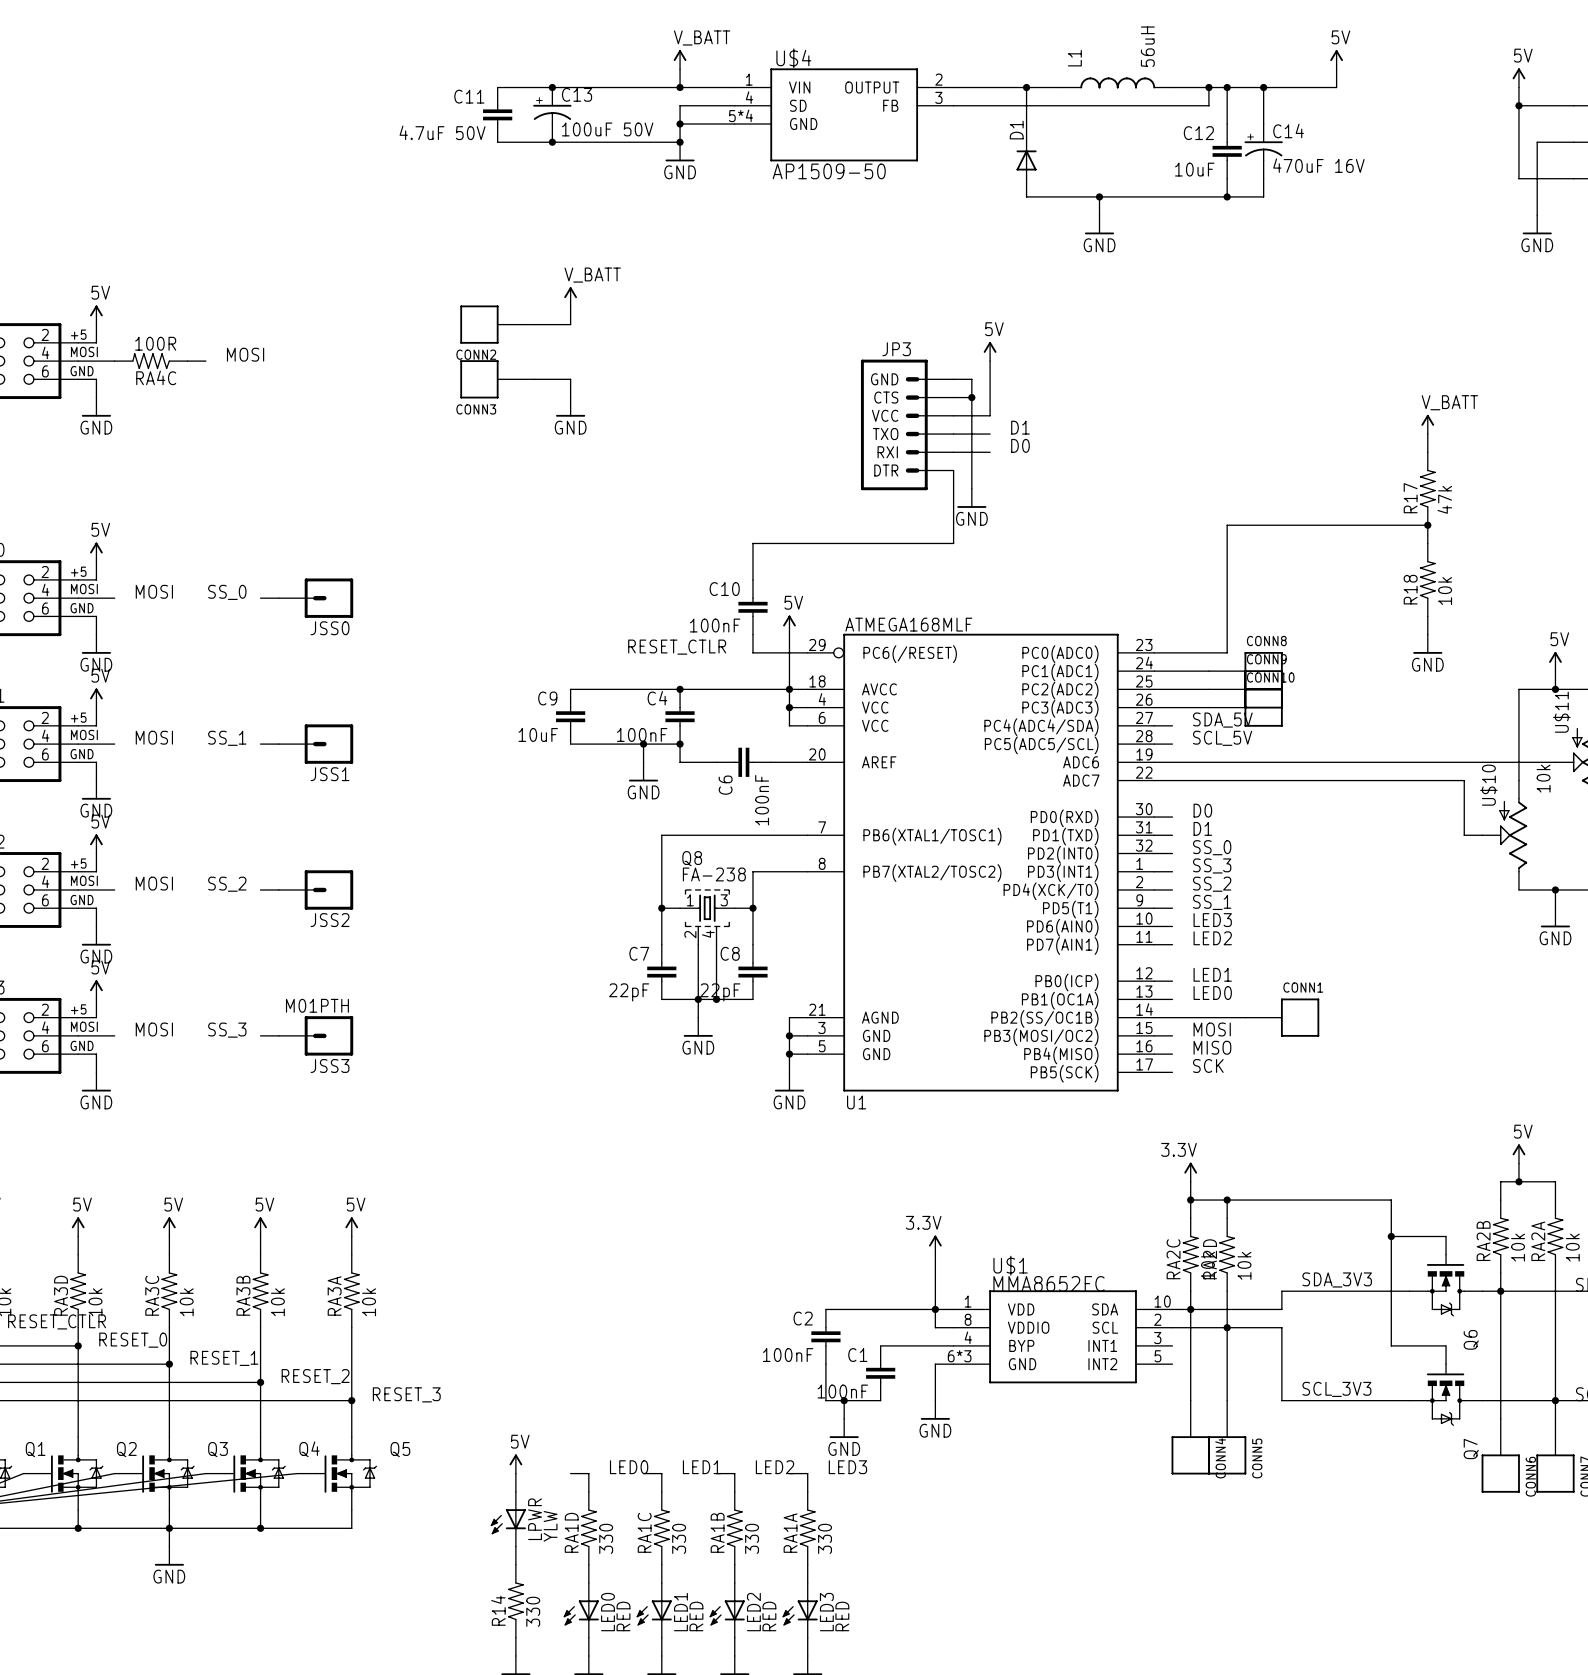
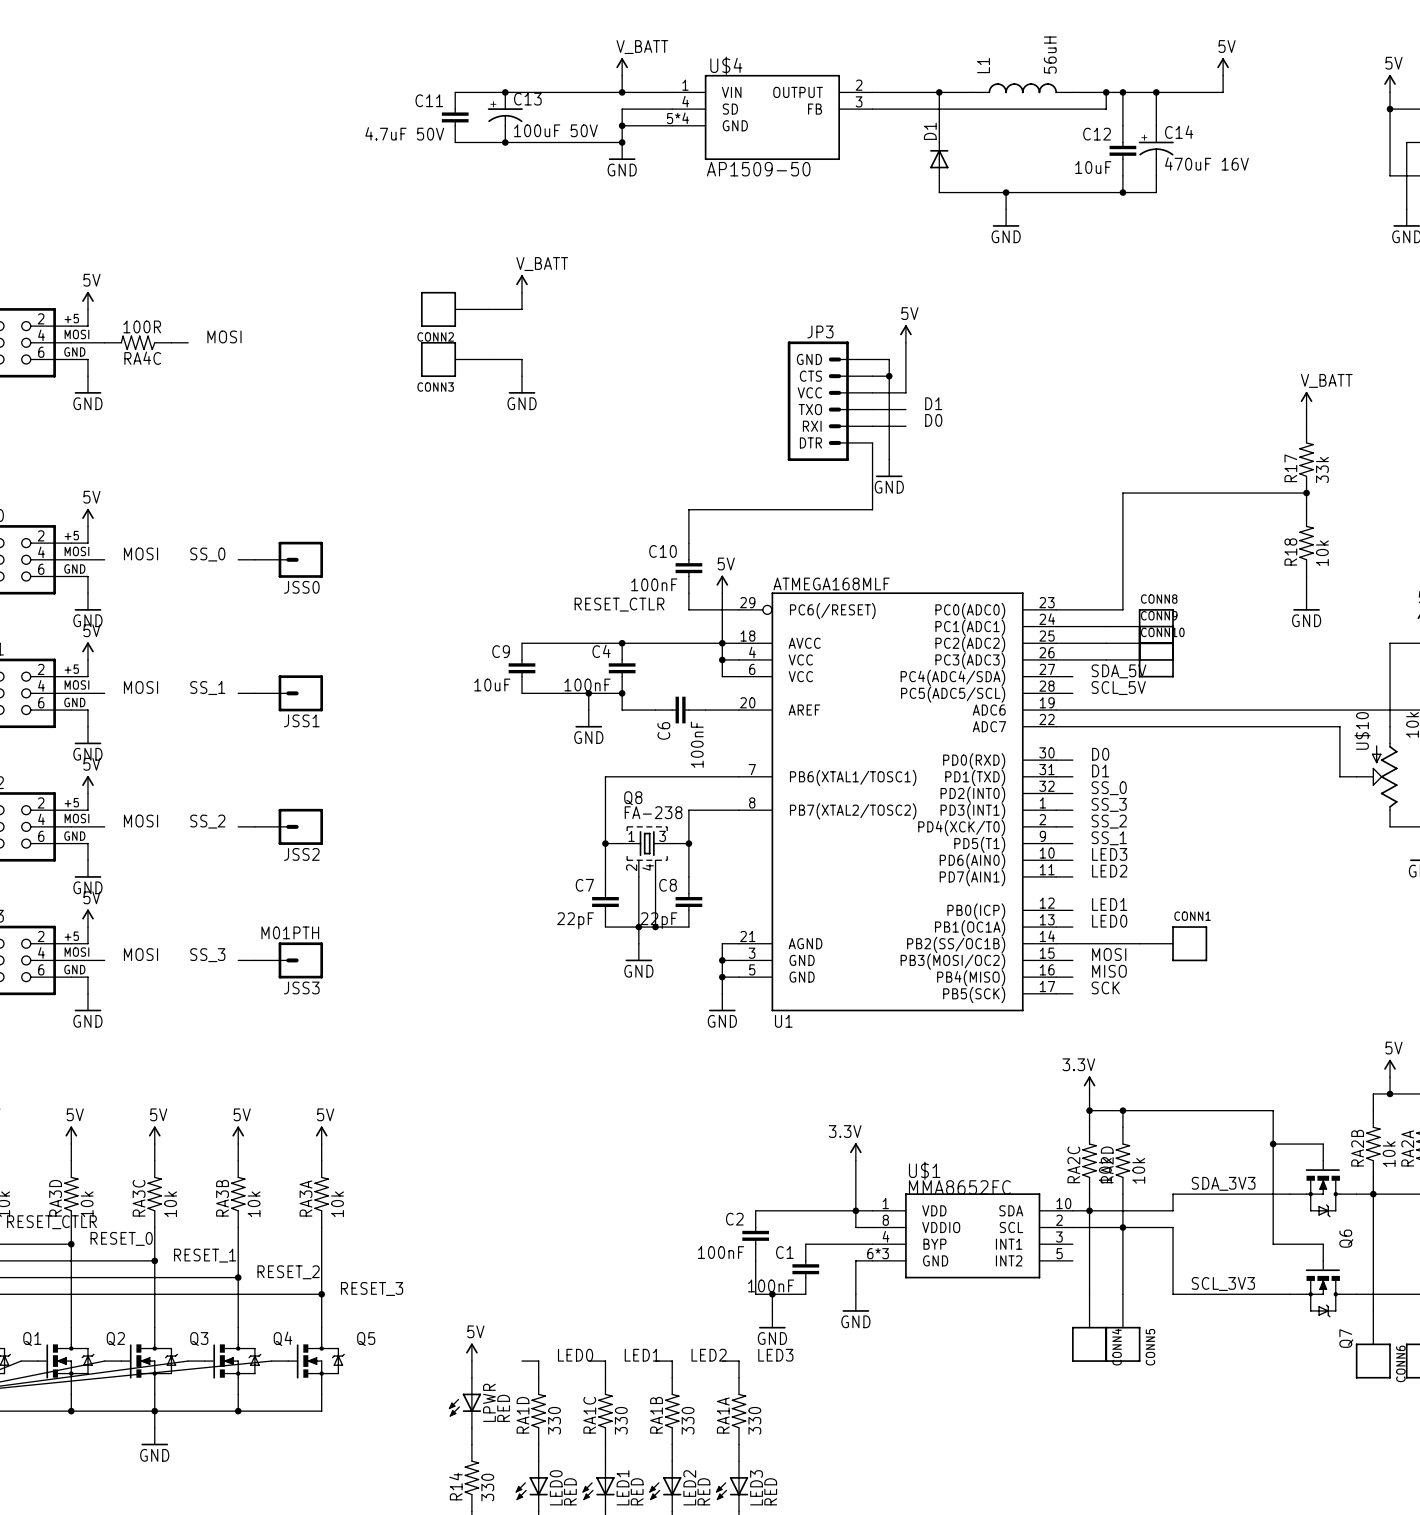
R17 value: 47k (1444, 499) -> 33k (1322, 470)
LPWR value: YLW (550, 1526) -> RED (503, 1408)

